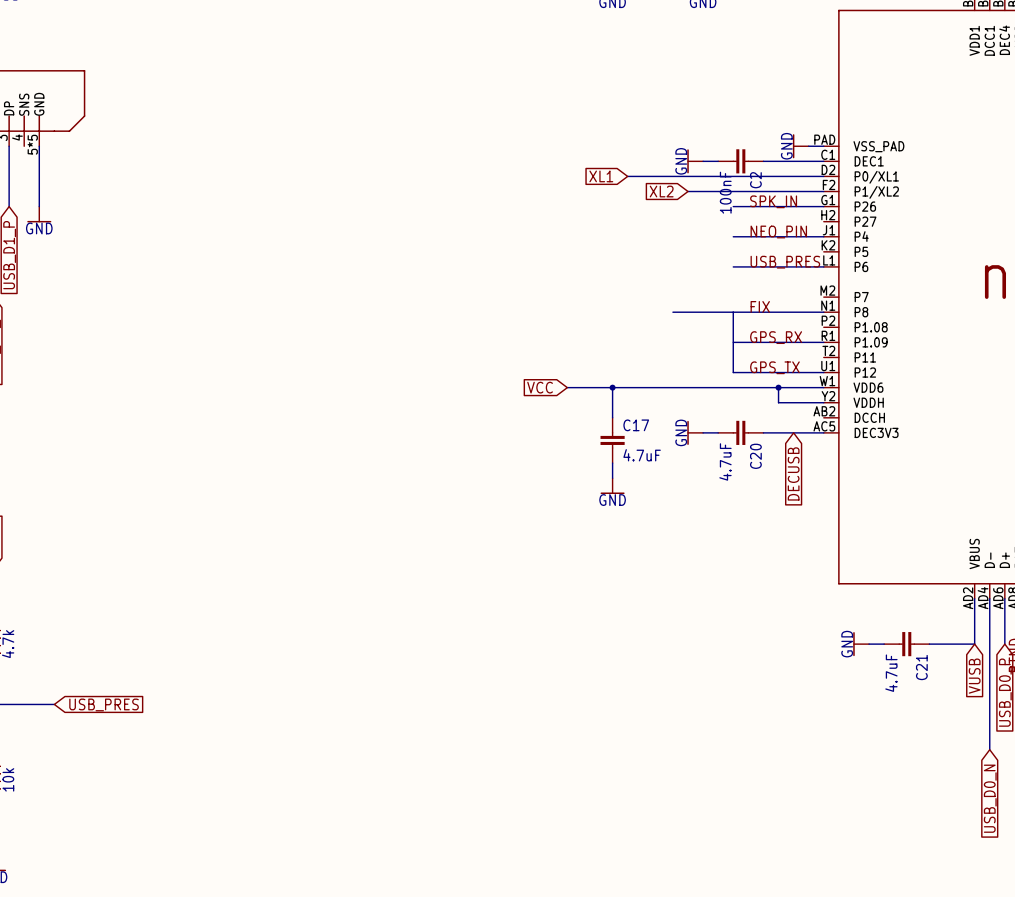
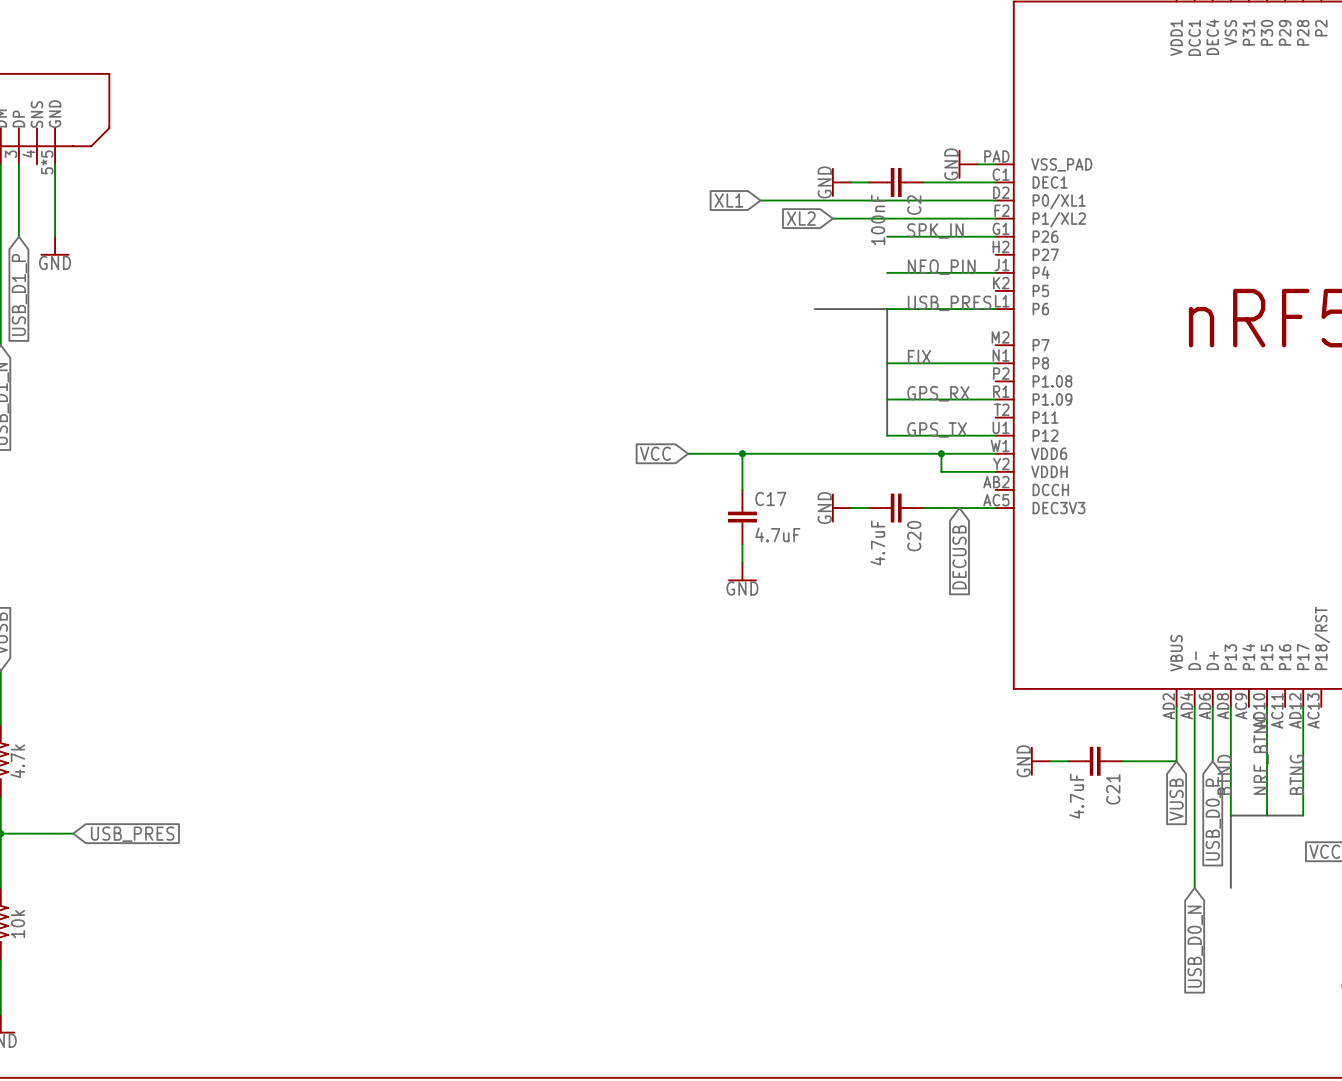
bus: (672, 312) (733, 312) -> (814, 309) (887, 309) (887, 363)

